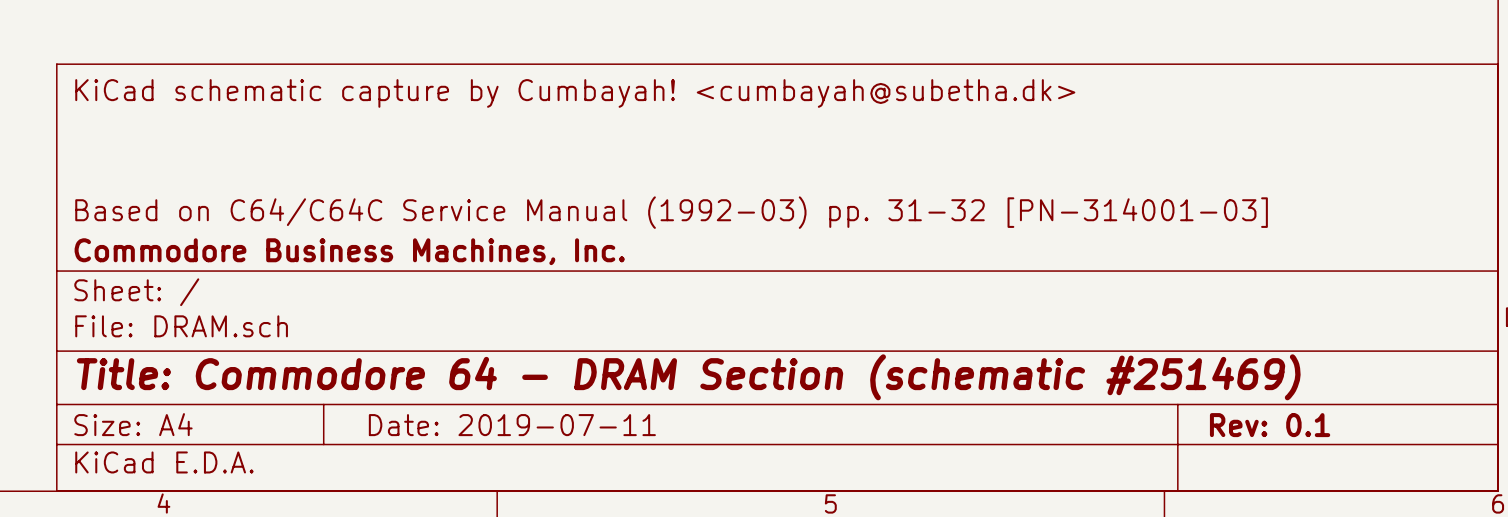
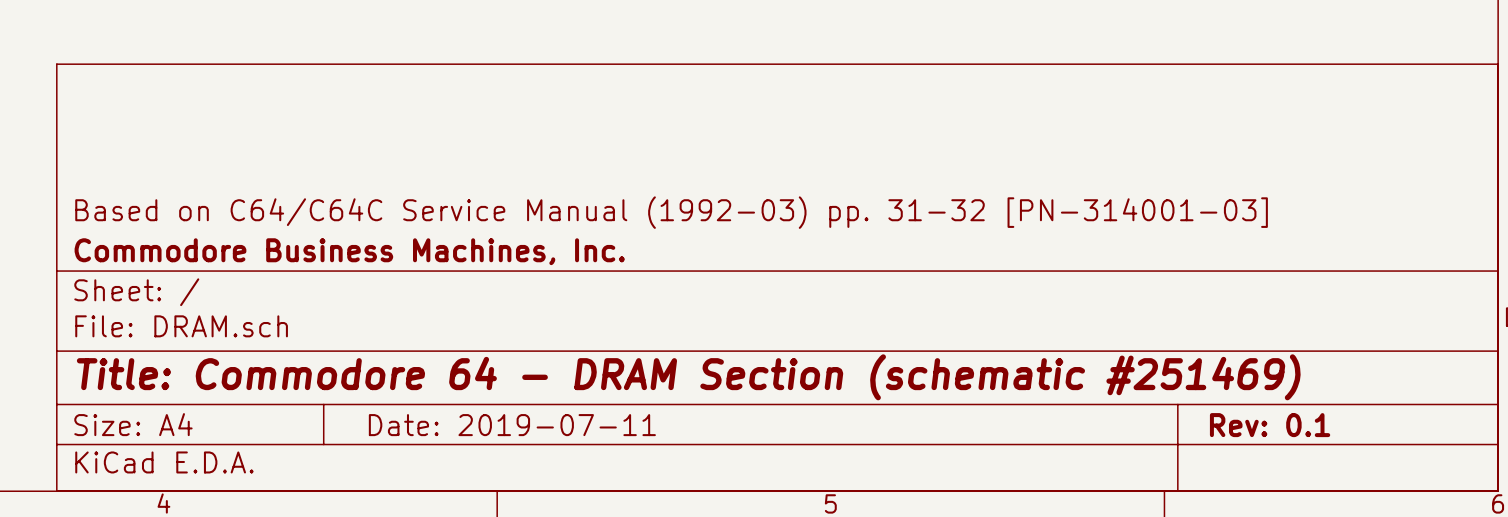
title block: KiCad schematic capture by Cumbayah! <cumbayah@subetha.dk> (575, 93) -> none

